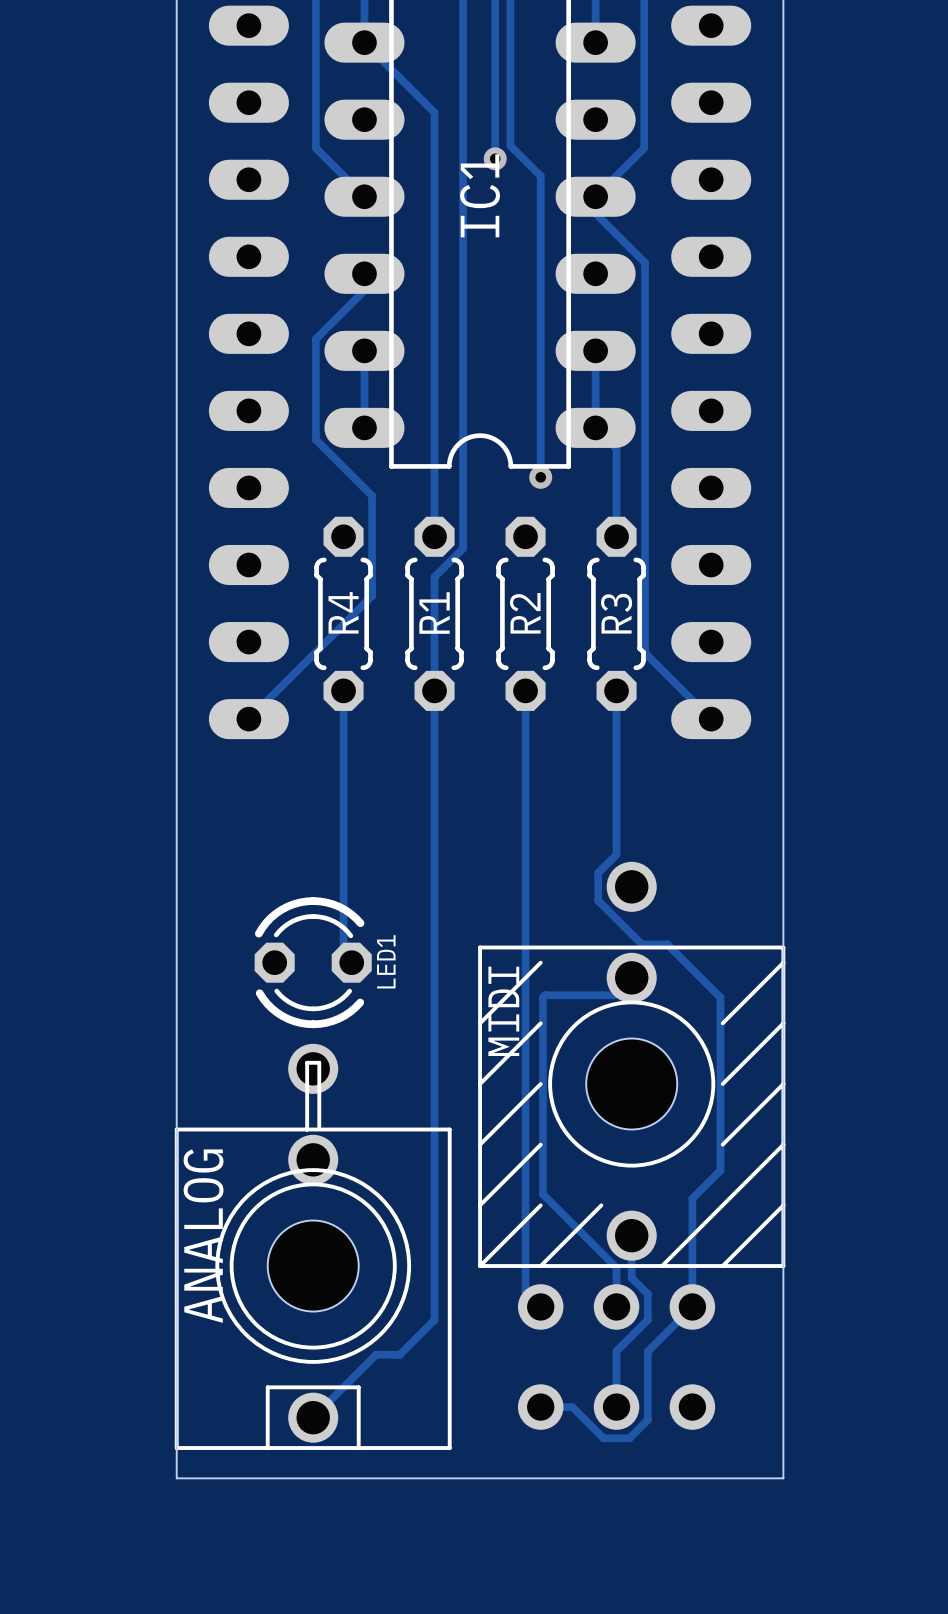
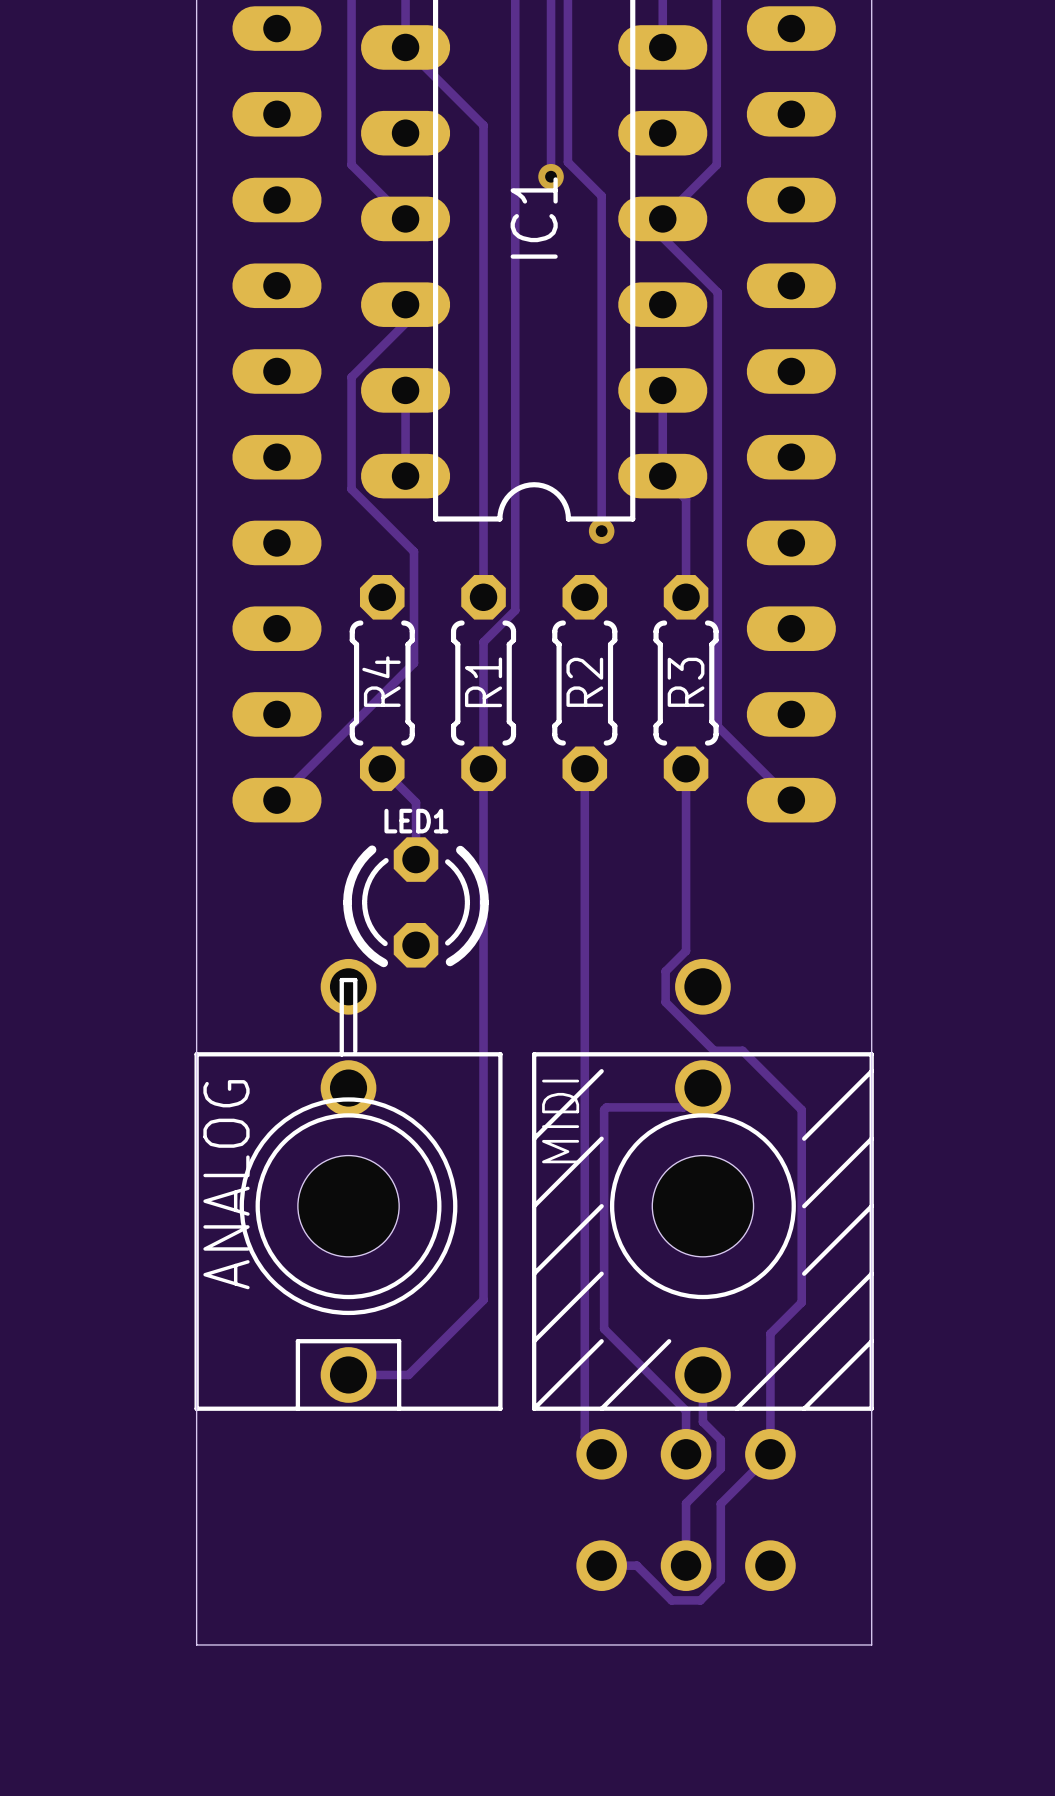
track: (343, 690) (343, 954) (351, 962) -> (382, 768) (416, 802) (416, 859)
LED1 rotation: 0° (313, 962) -> 90° counterclockwise (416, 902)
LED1 position: (313, 962) -> (416, 902)
track: (434, 1168) (434, 1319) (399, 1354) (376, 1354) (313, 1417) -> (483, 1300) (408, 1374) (348, 1374)
ANALOG position: (313, 1246) -> (348, 1184)
hole position: (313, 1266) -> (348, 1206)

